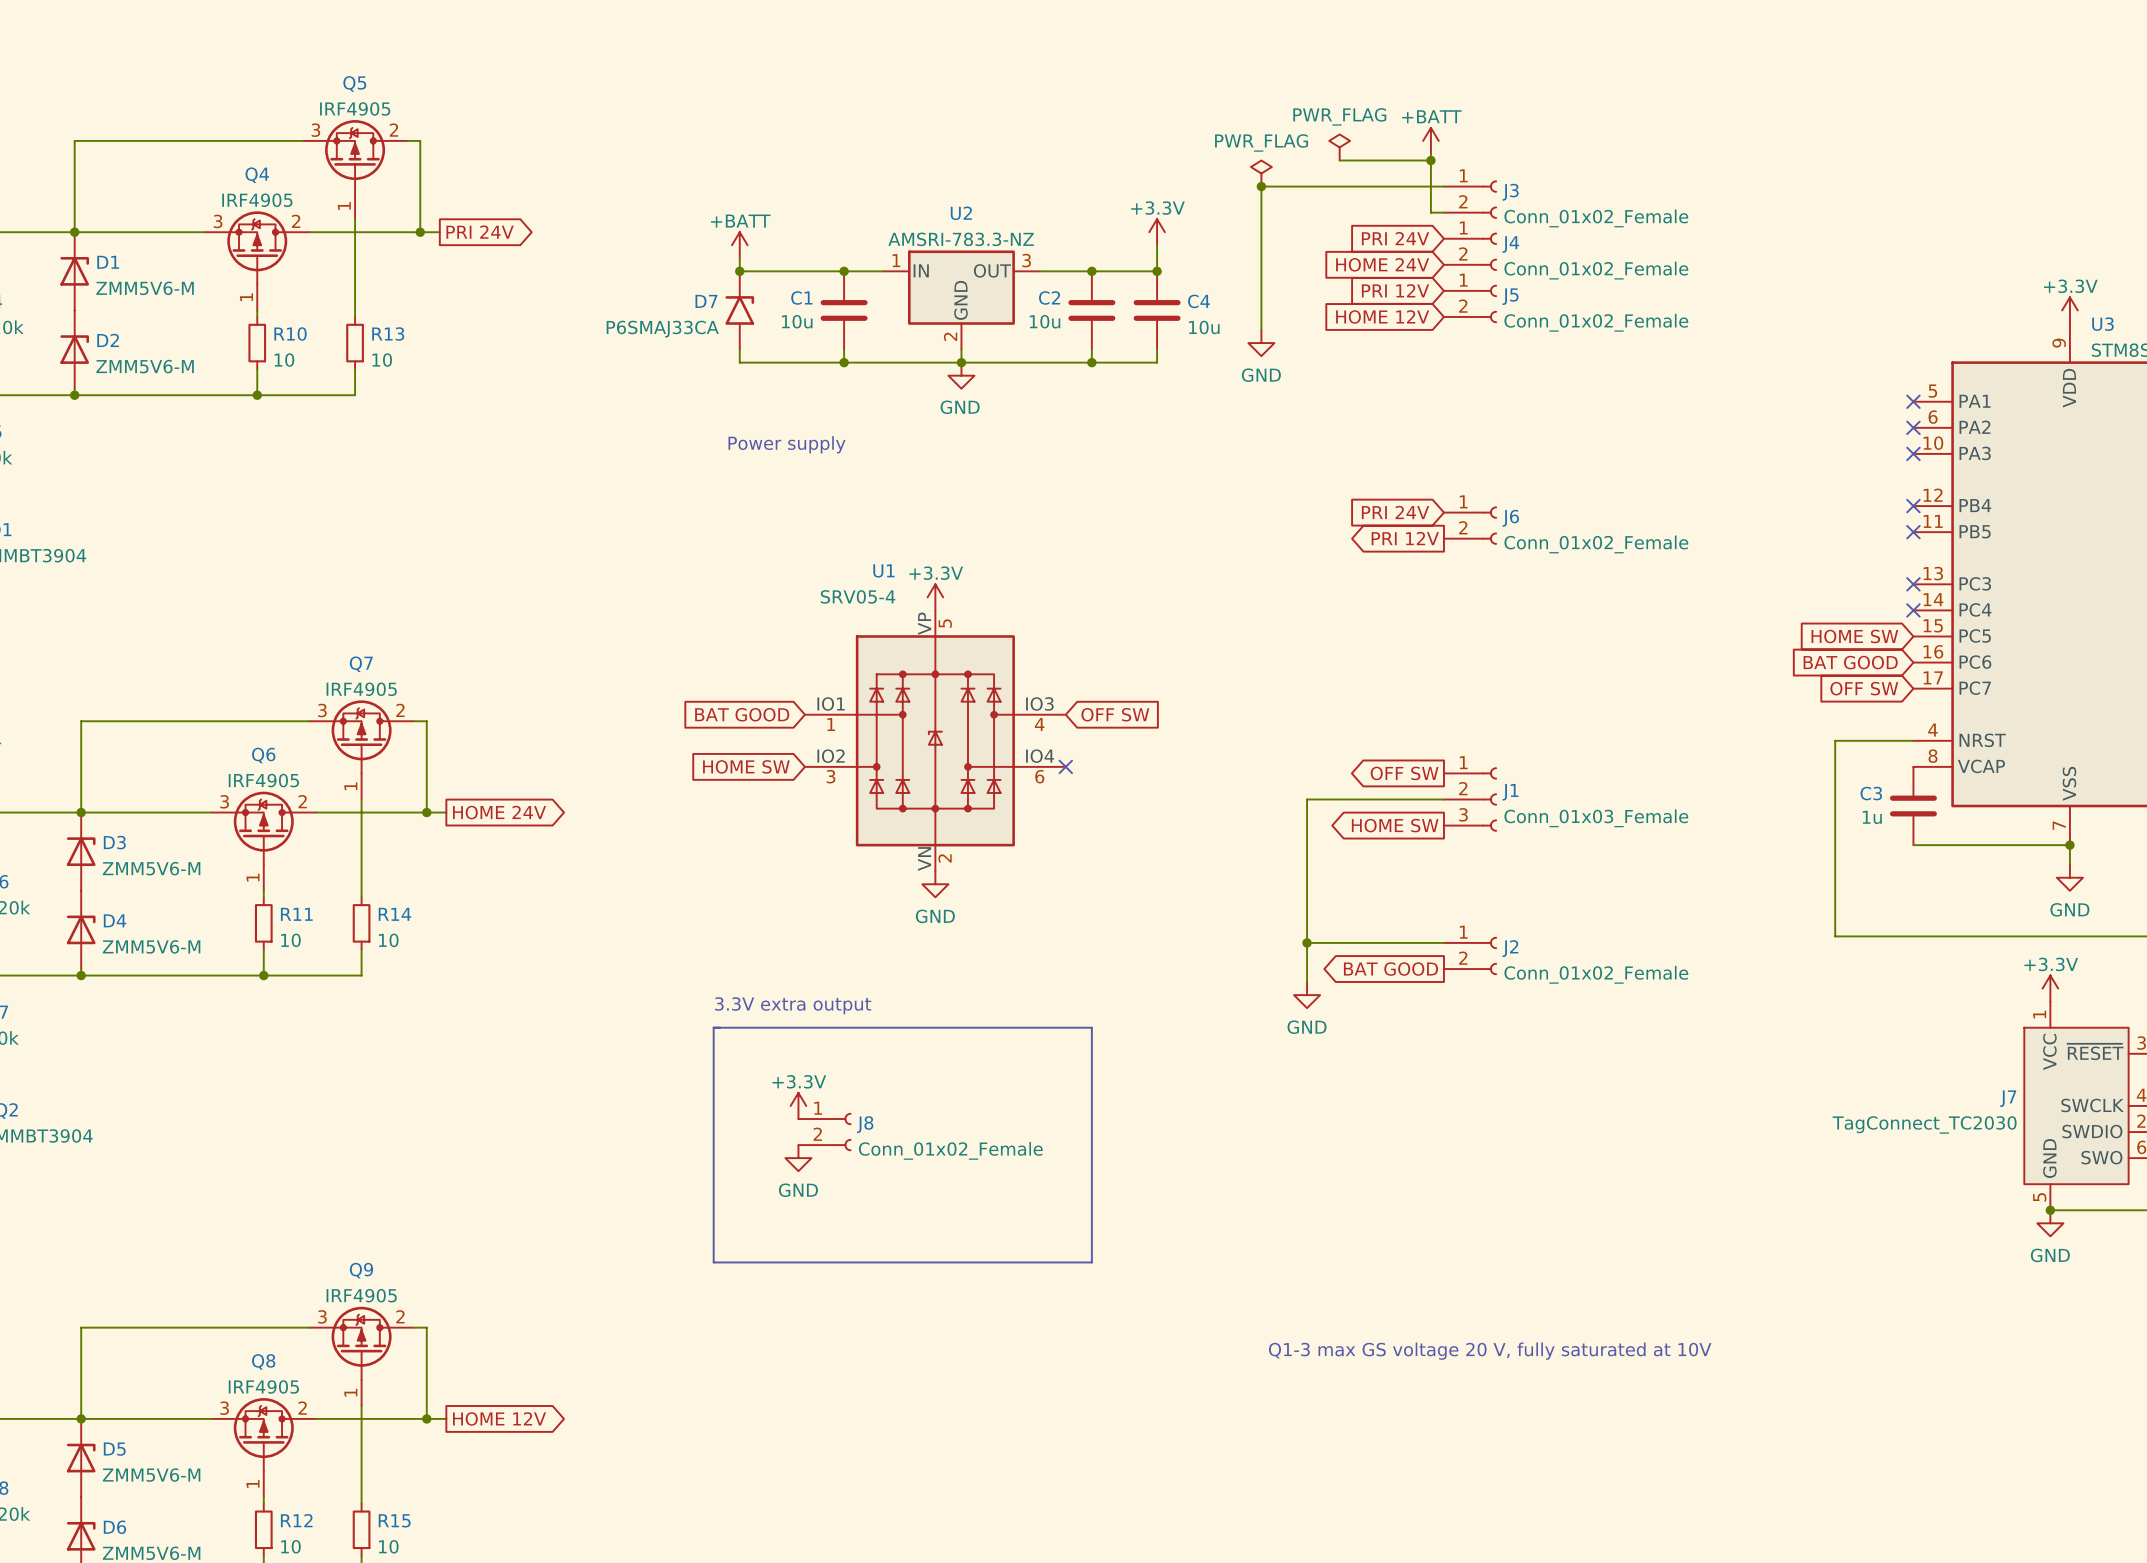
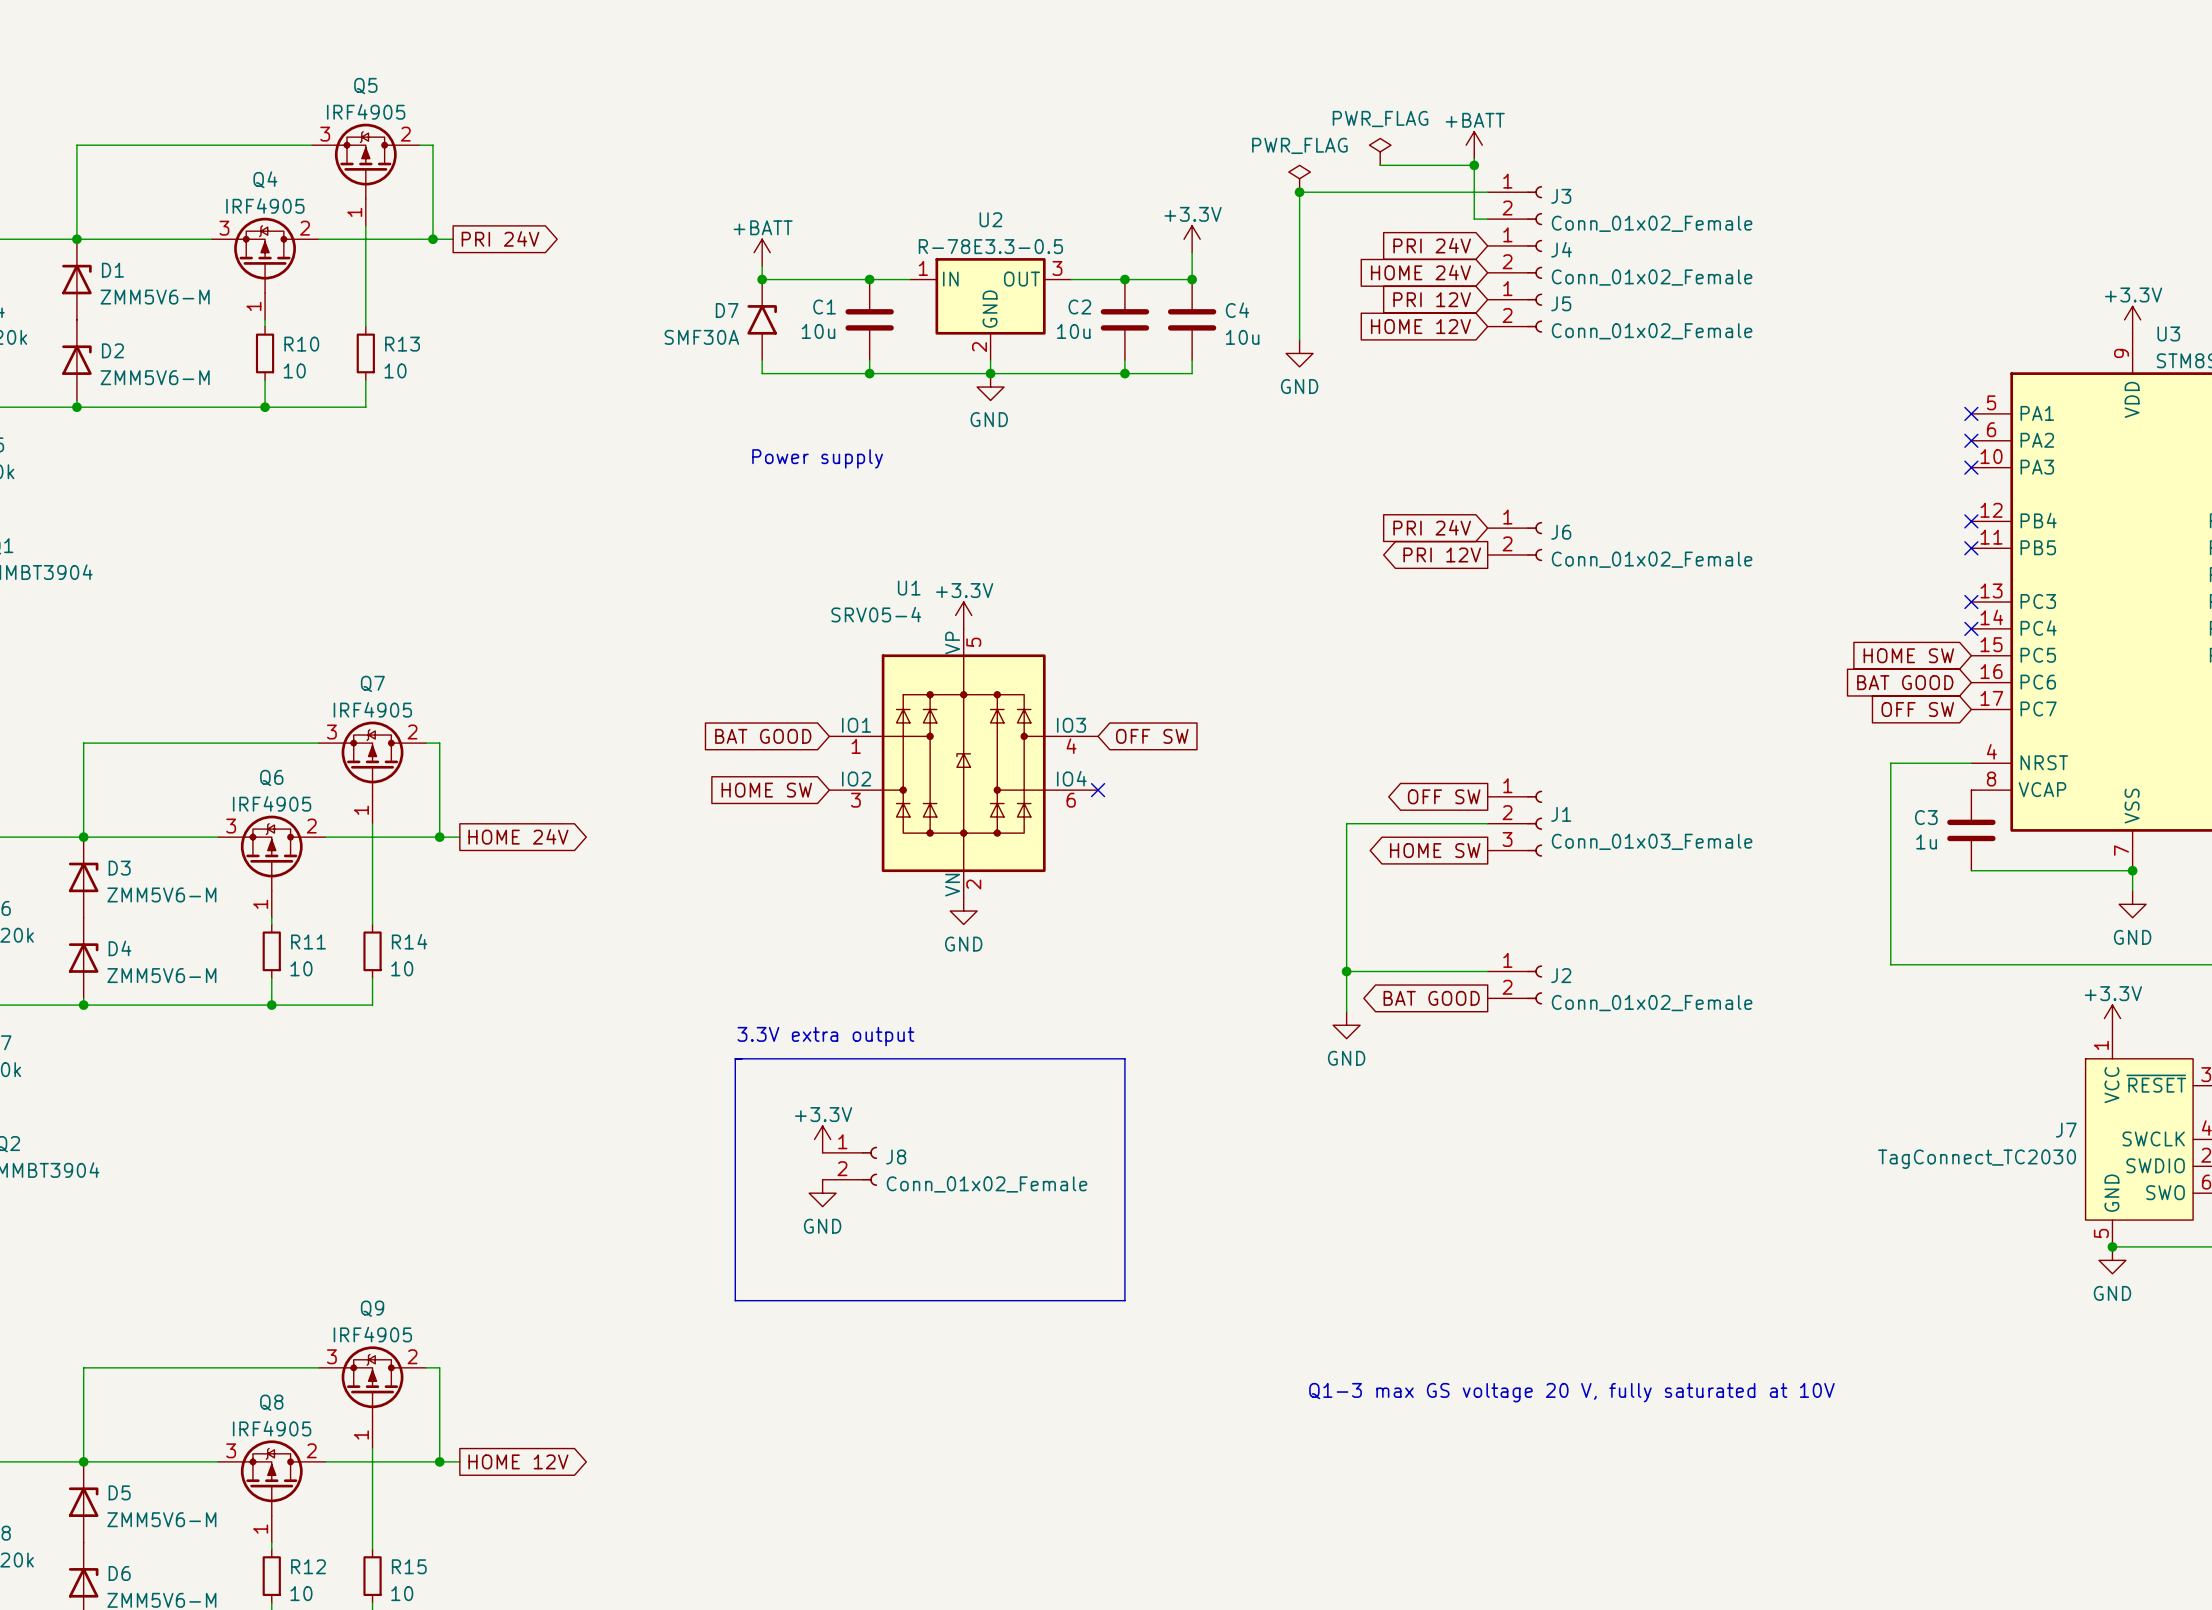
U2 value: AMSRI-783.3-NZ (961, 239) -> R-78E3.3-0.5 (990, 246)
D7 value: P6SMAJ33CA (662, 329) -> SMF30A (701, 337)

